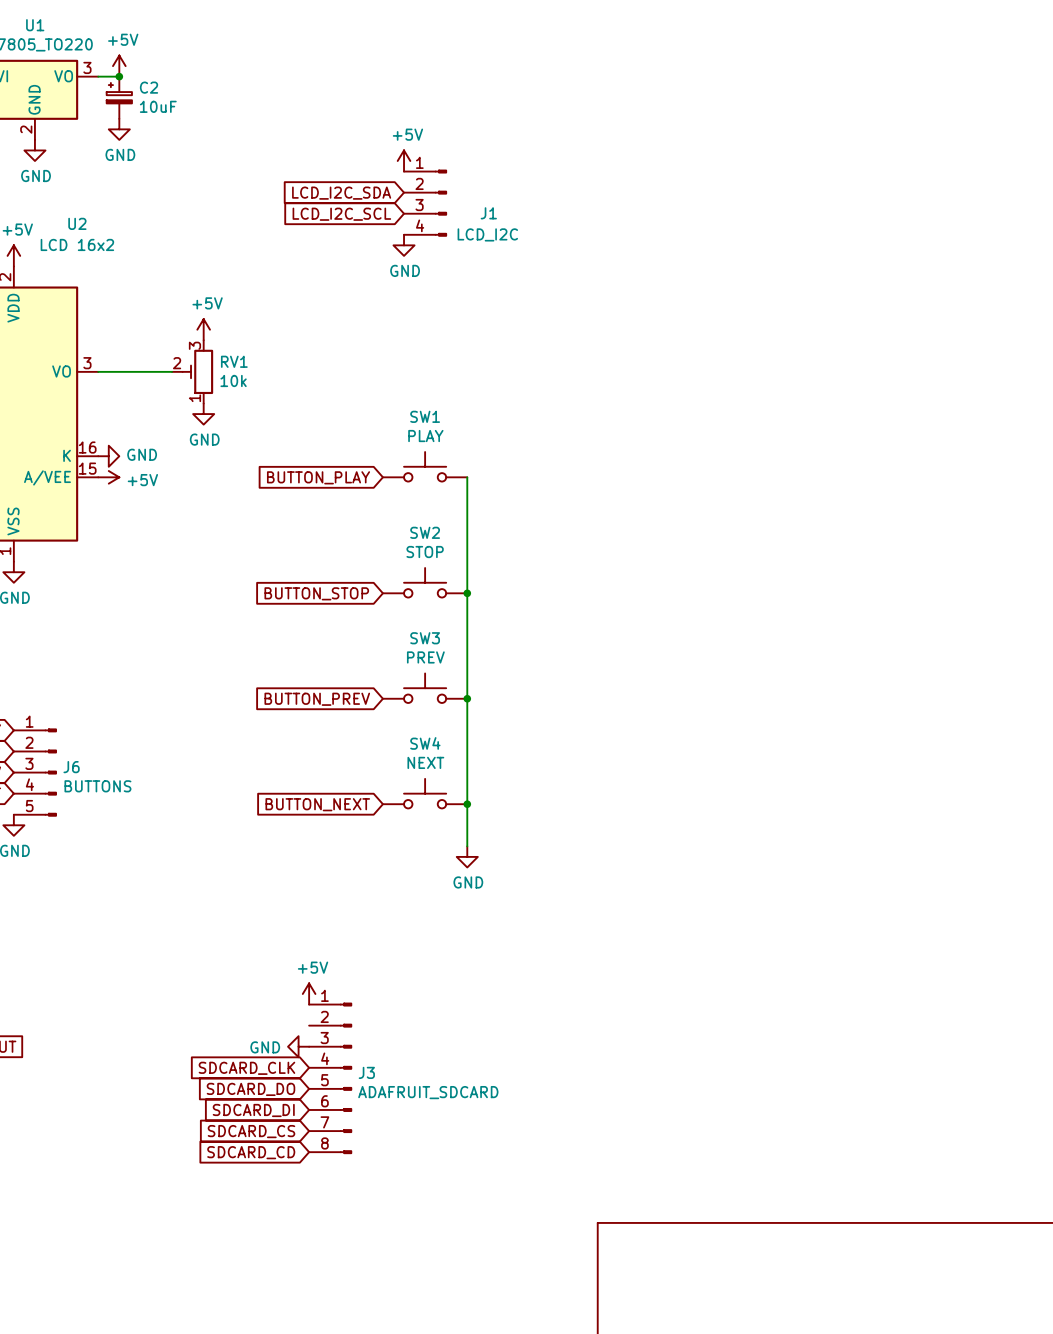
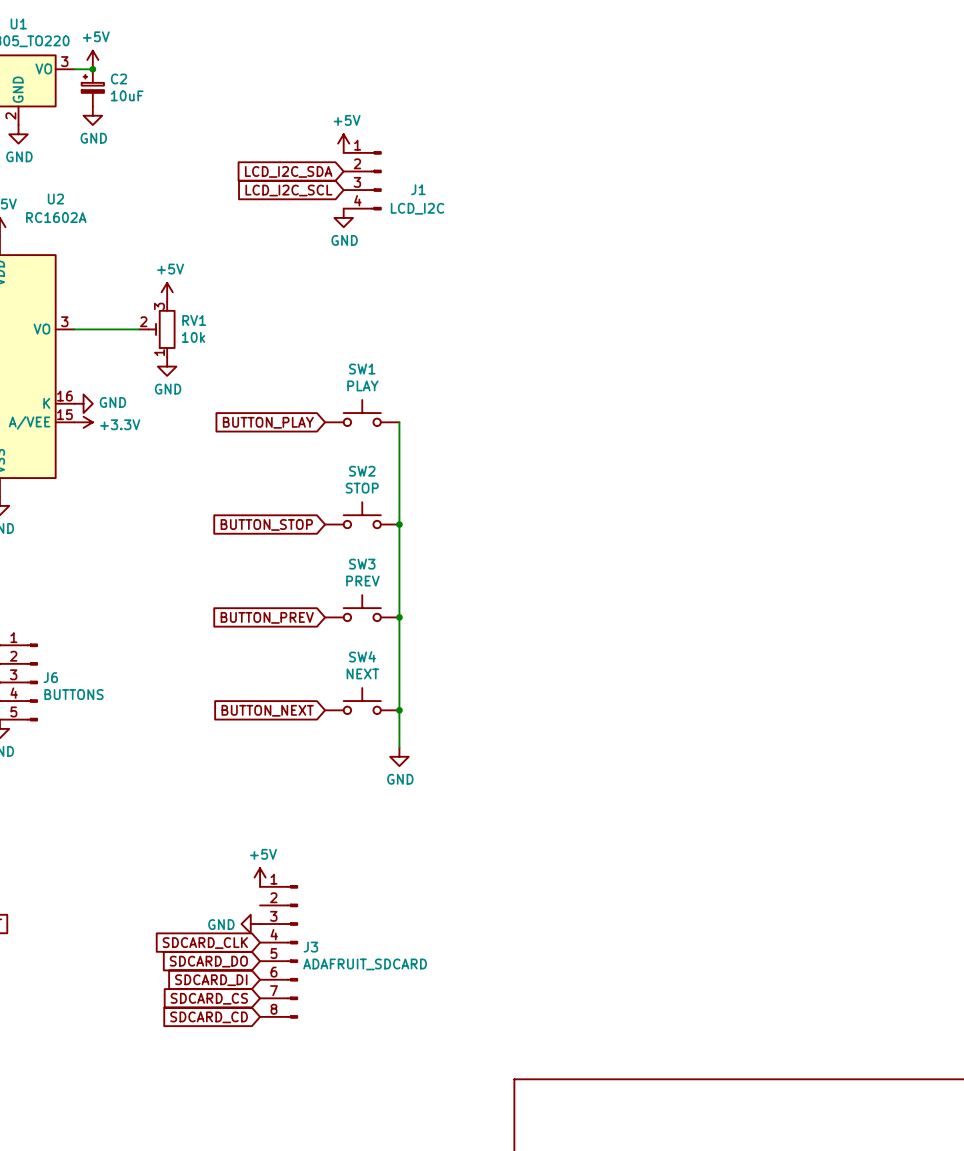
U2 value: LCD 16x2 (77, 244) -> RC1602A (56, 217)
power symbol: +5V (108, 477) -> +3.3V (83, 422)

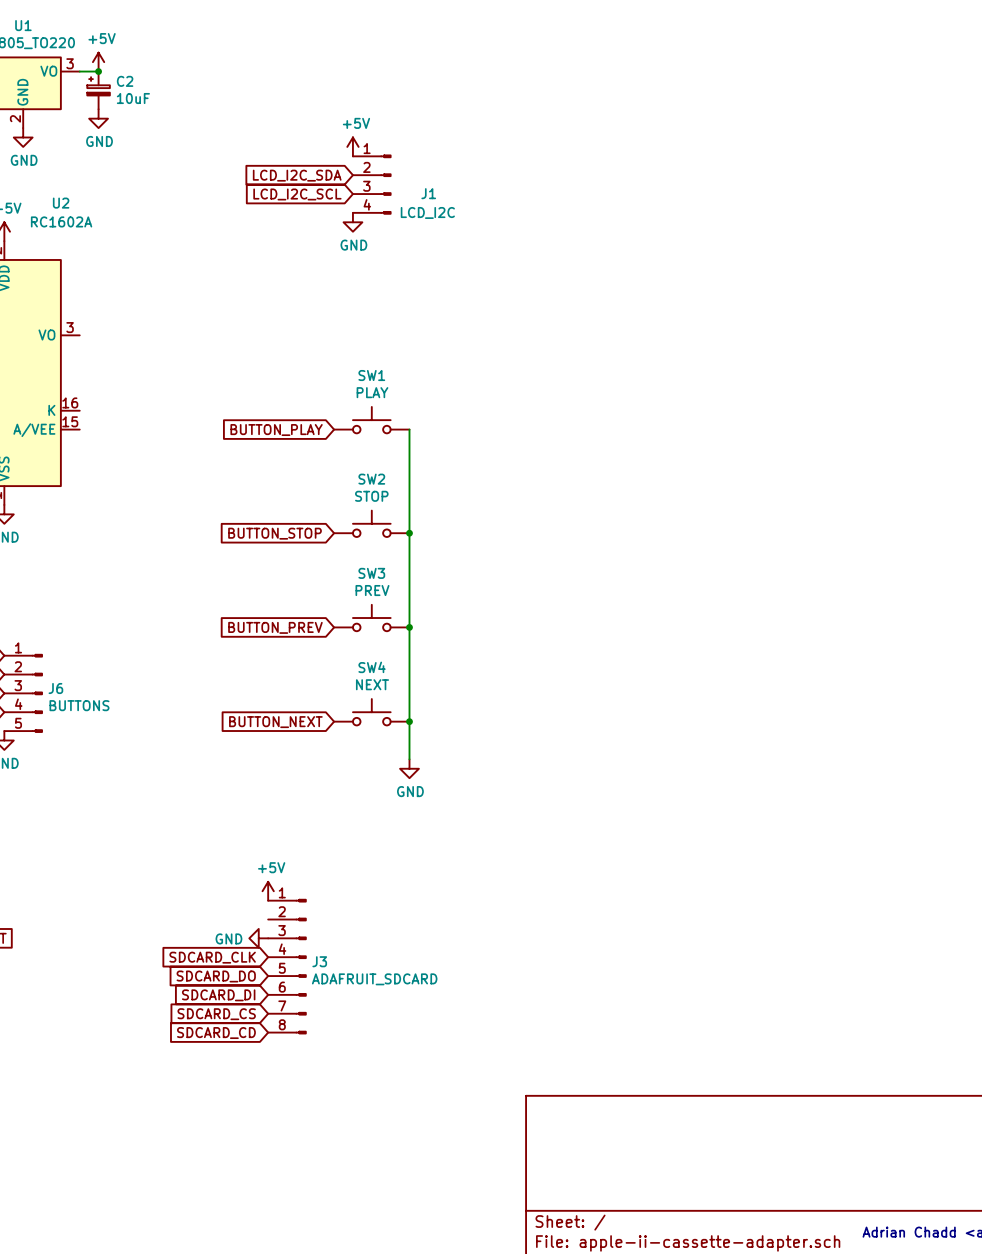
power symbol: +5V (167, 292) -> none
wire: (74, 329) (139, 329) -> none
RV1: 10k (157, 329) -> none
power symbol: GND (167, 366) -> none
power symbol: GND (83, 403) -> none
power symbol: +3.3V (83, 422) -> none

